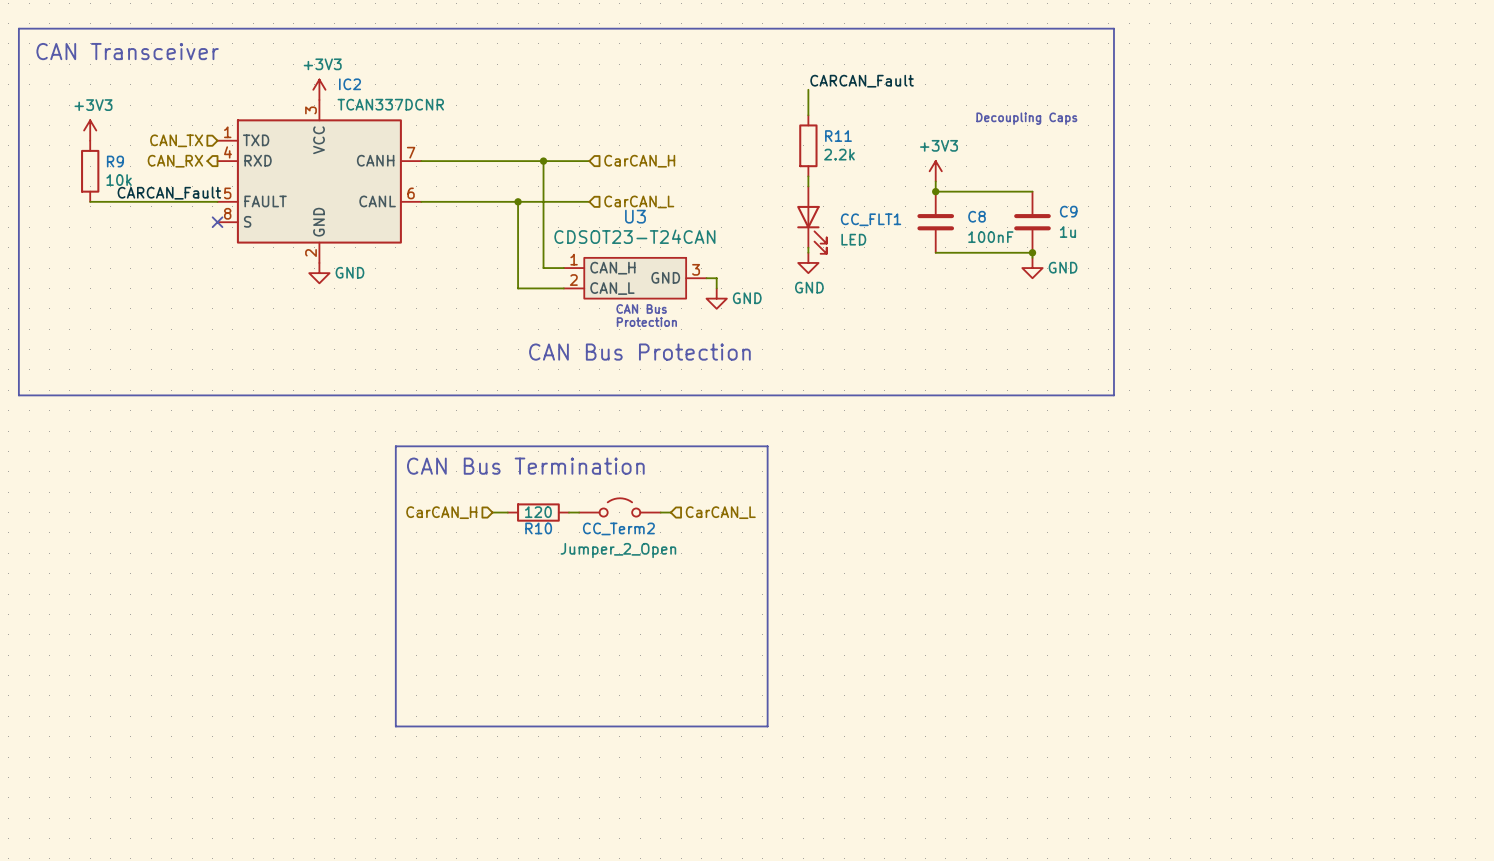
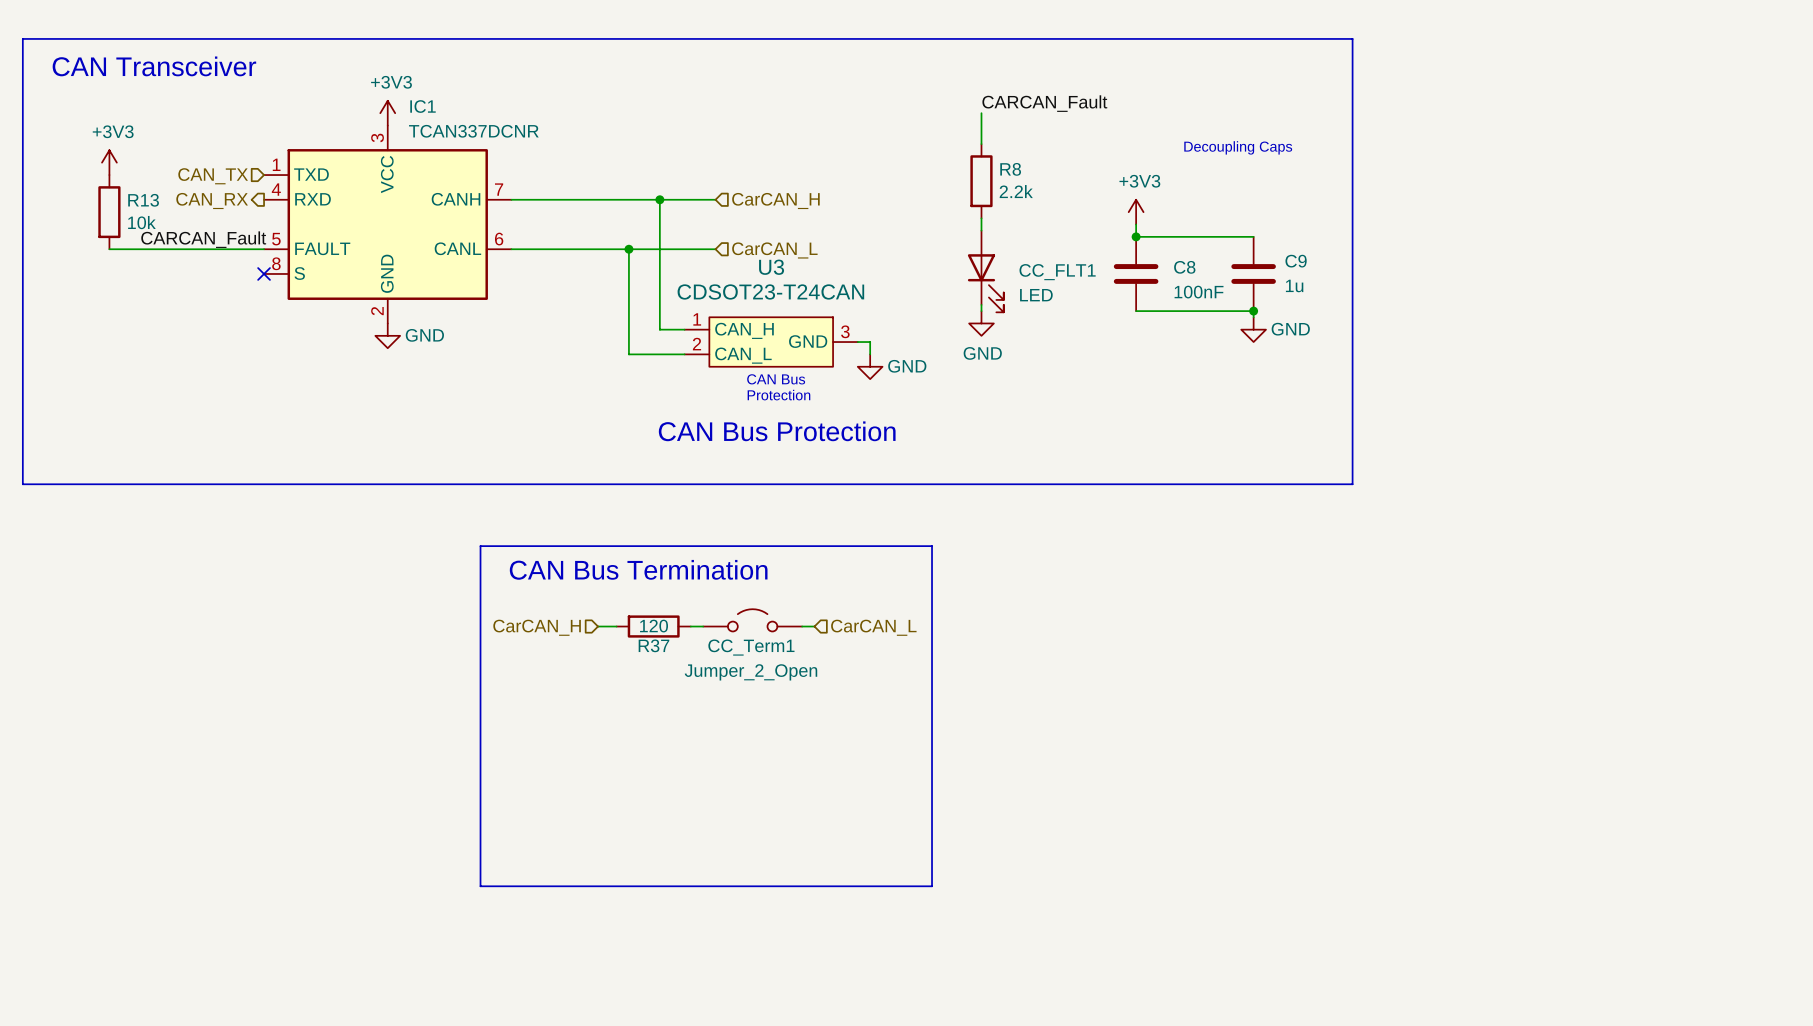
IC2 name: IC2 (350, 84) -> IC1 (423, 106)
R11 name: R11 (838, 136) -> R8 (1010, 169)
R9 name: R9 (115, 161) -> R13 (143, 200)
R10 name: R10 (538, 528) -> R37 (653, 645)
CC_Term2 name: CC_Term2 (618, 528) -> CC_Term1 (751, 647)

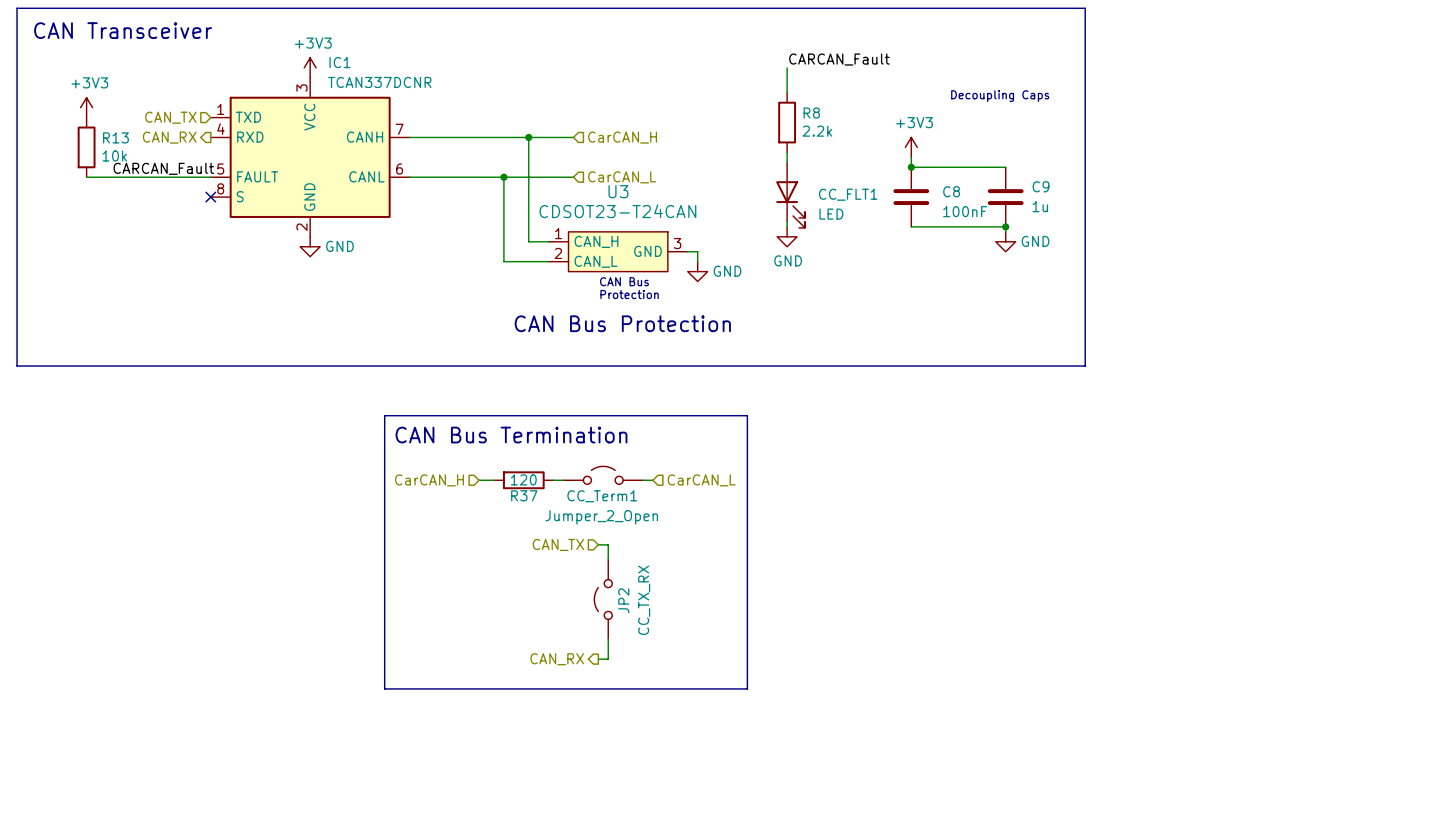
wire: none -> (598, 544) (608, 544) (608, 559)
hierarchical label: none -> CAN_TX (558, 544)
JP2: none -> CC_TX_RX (603, 599)
wire: none -> (608, 639) (608, 659) (598, 659)
hierarchical label: none -> CAN_RX (557, 659)

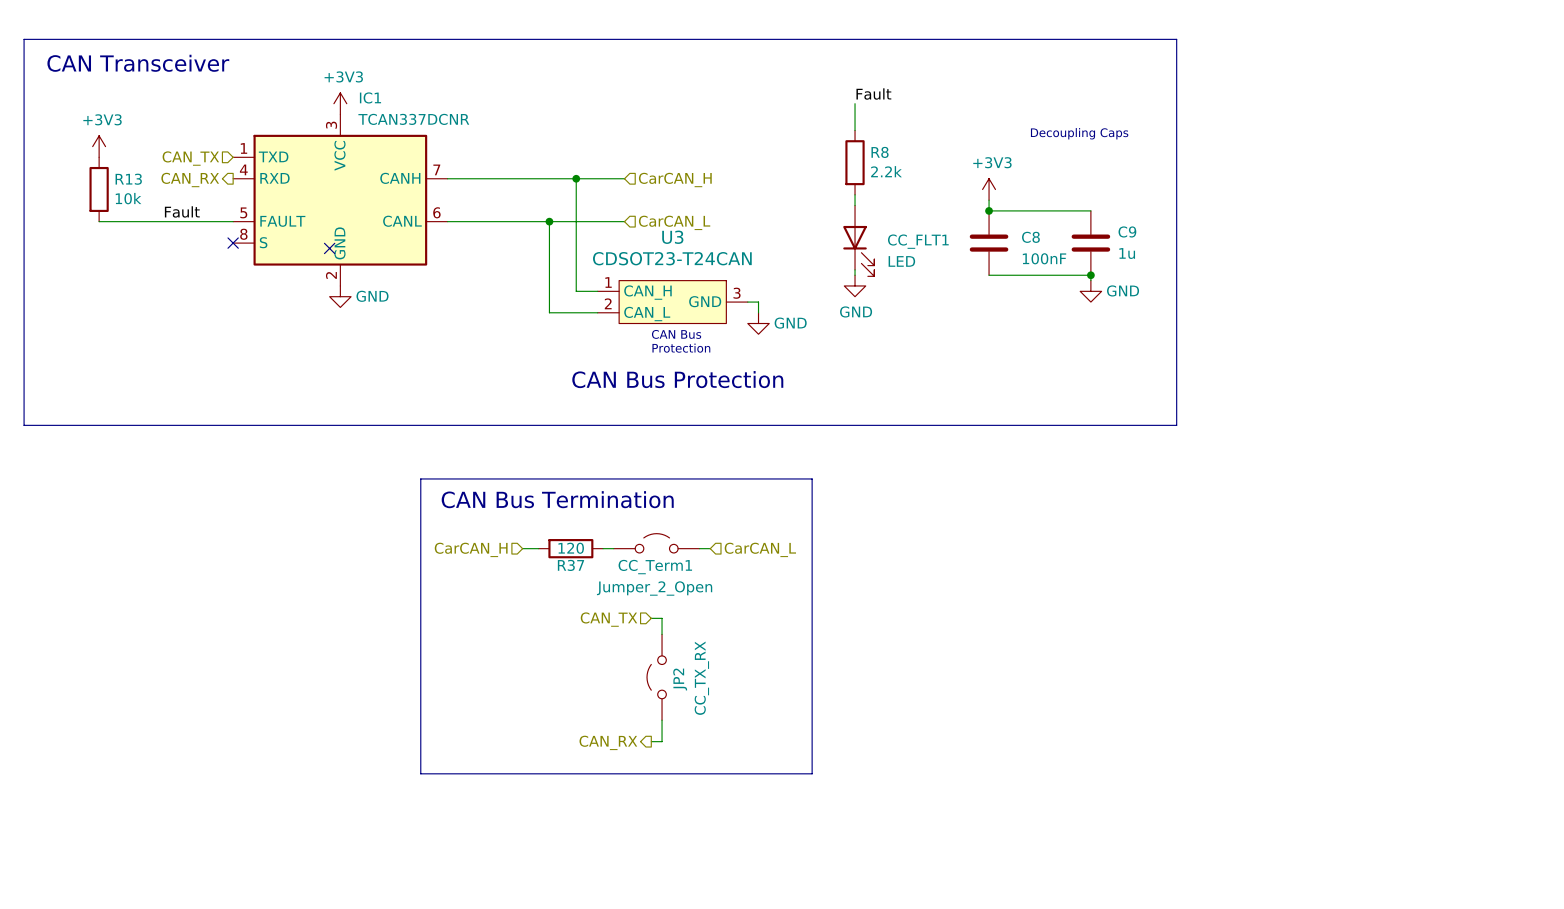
label: CARCAN_Fault (839, 59) -> Fault (873, 94)
label: CARCAN_Fault (163, 168) -> none
label: none -> Fault (182, 211)
no-connect mark: none -> (329, 248)

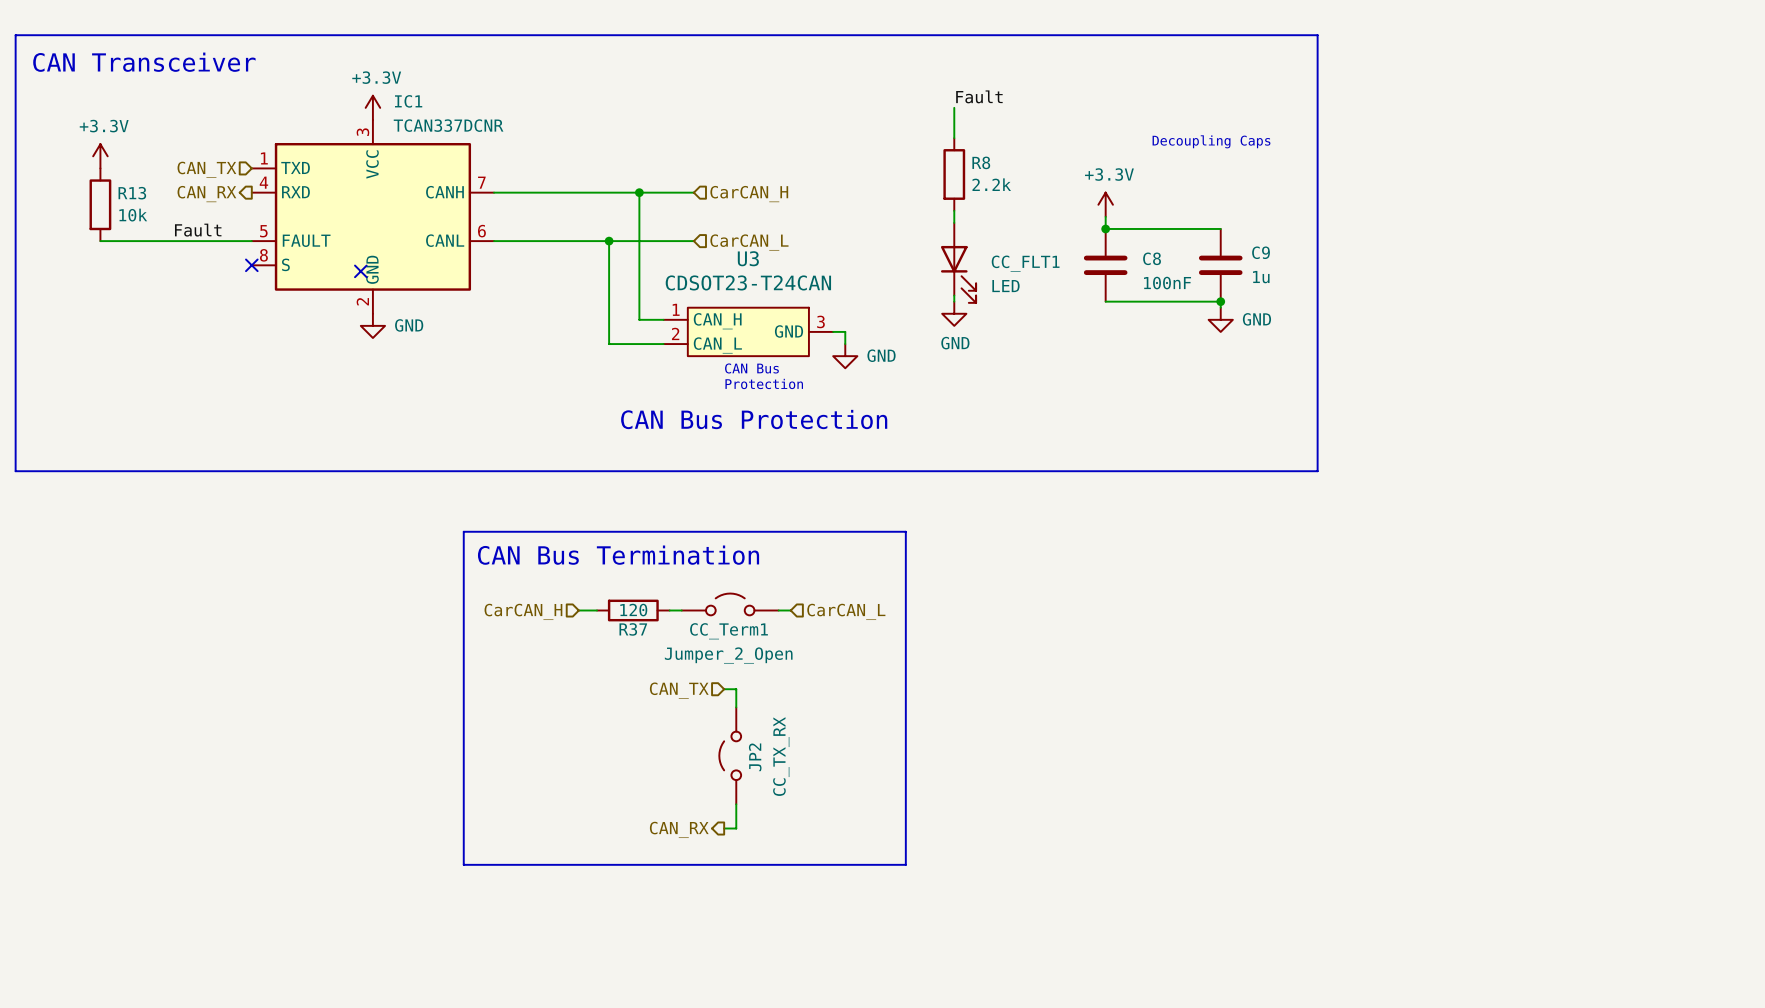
power symbol: +3V3 (340, 103) -> +3.3V (372, 107)
power symbol: +3V3 (99, 146) -> +3.3V (100, 156)
power symbol: +3V3 (989, 189) -> +3.3V (1105, 204)

